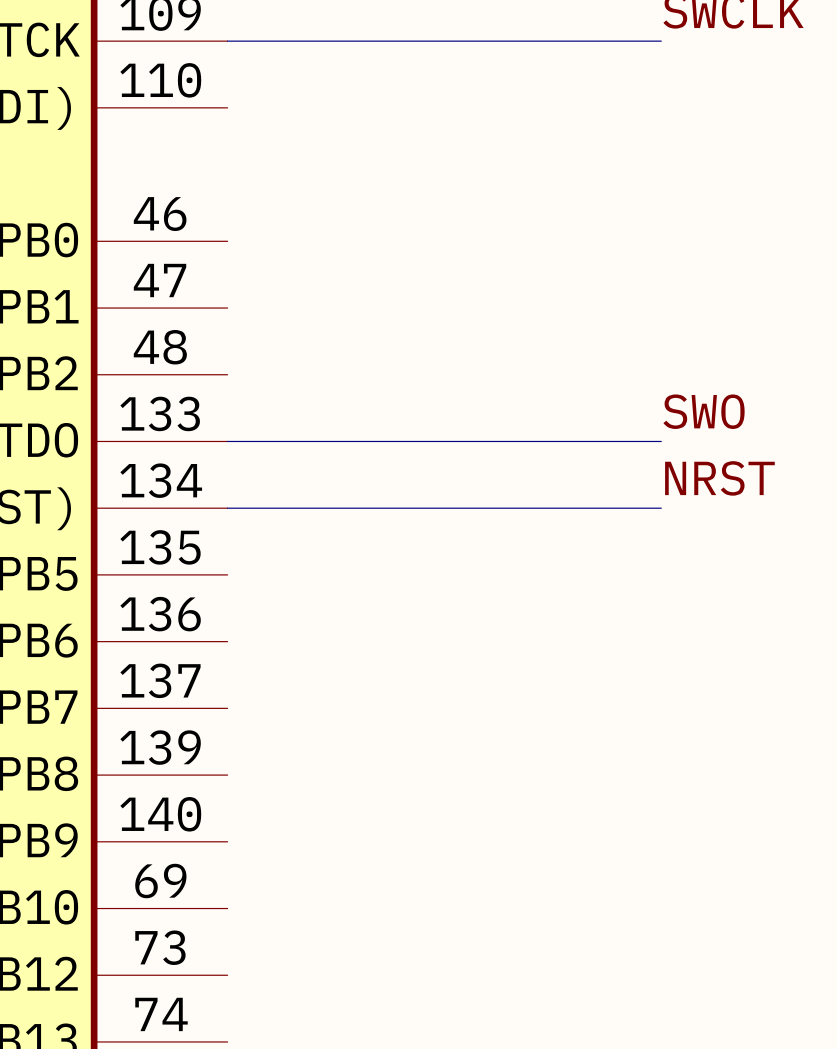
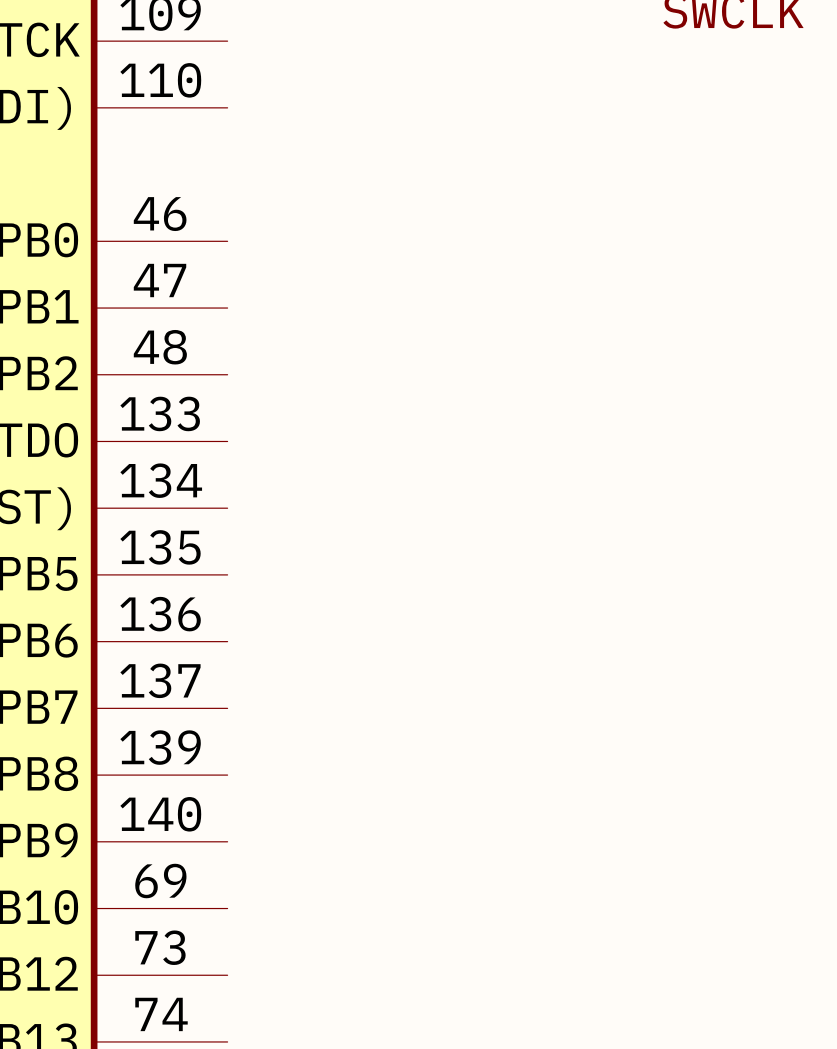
wire: (227, 41) (661, 41) -> none
label: SWO (704, 411) -> none
wire: (227, 441) (661, 441) -> none
label: NRST (719, 478) -> none
wire: (227, 508) (661, 508) -> none

